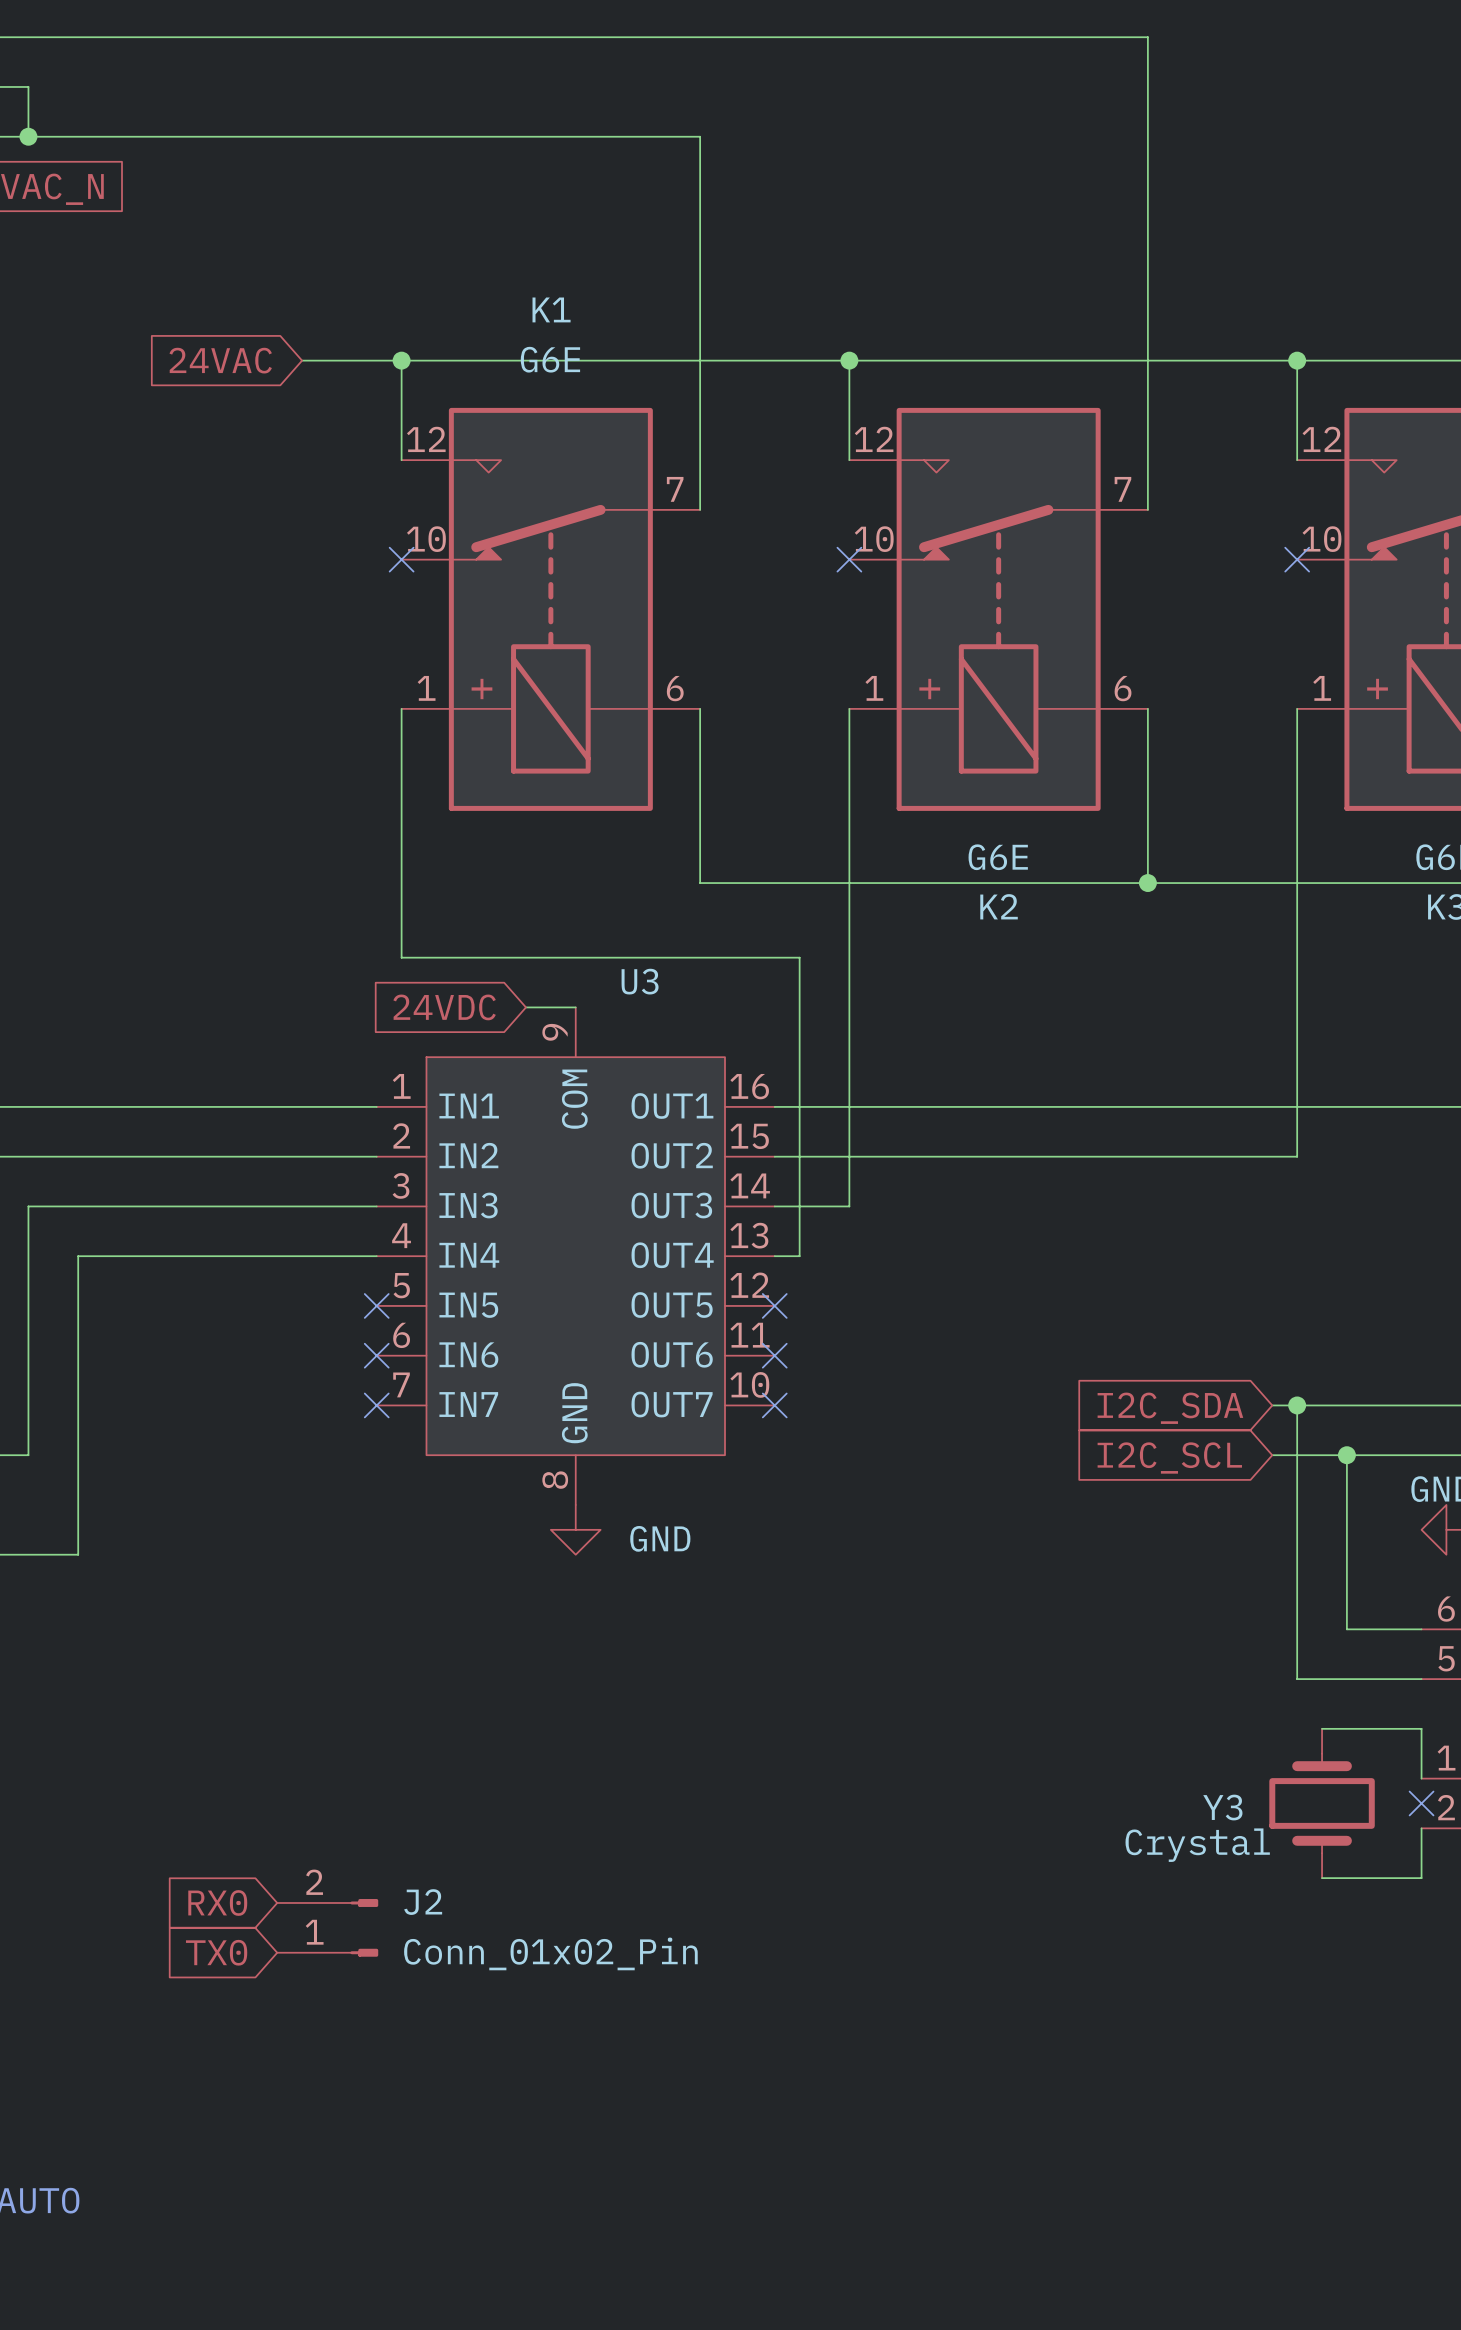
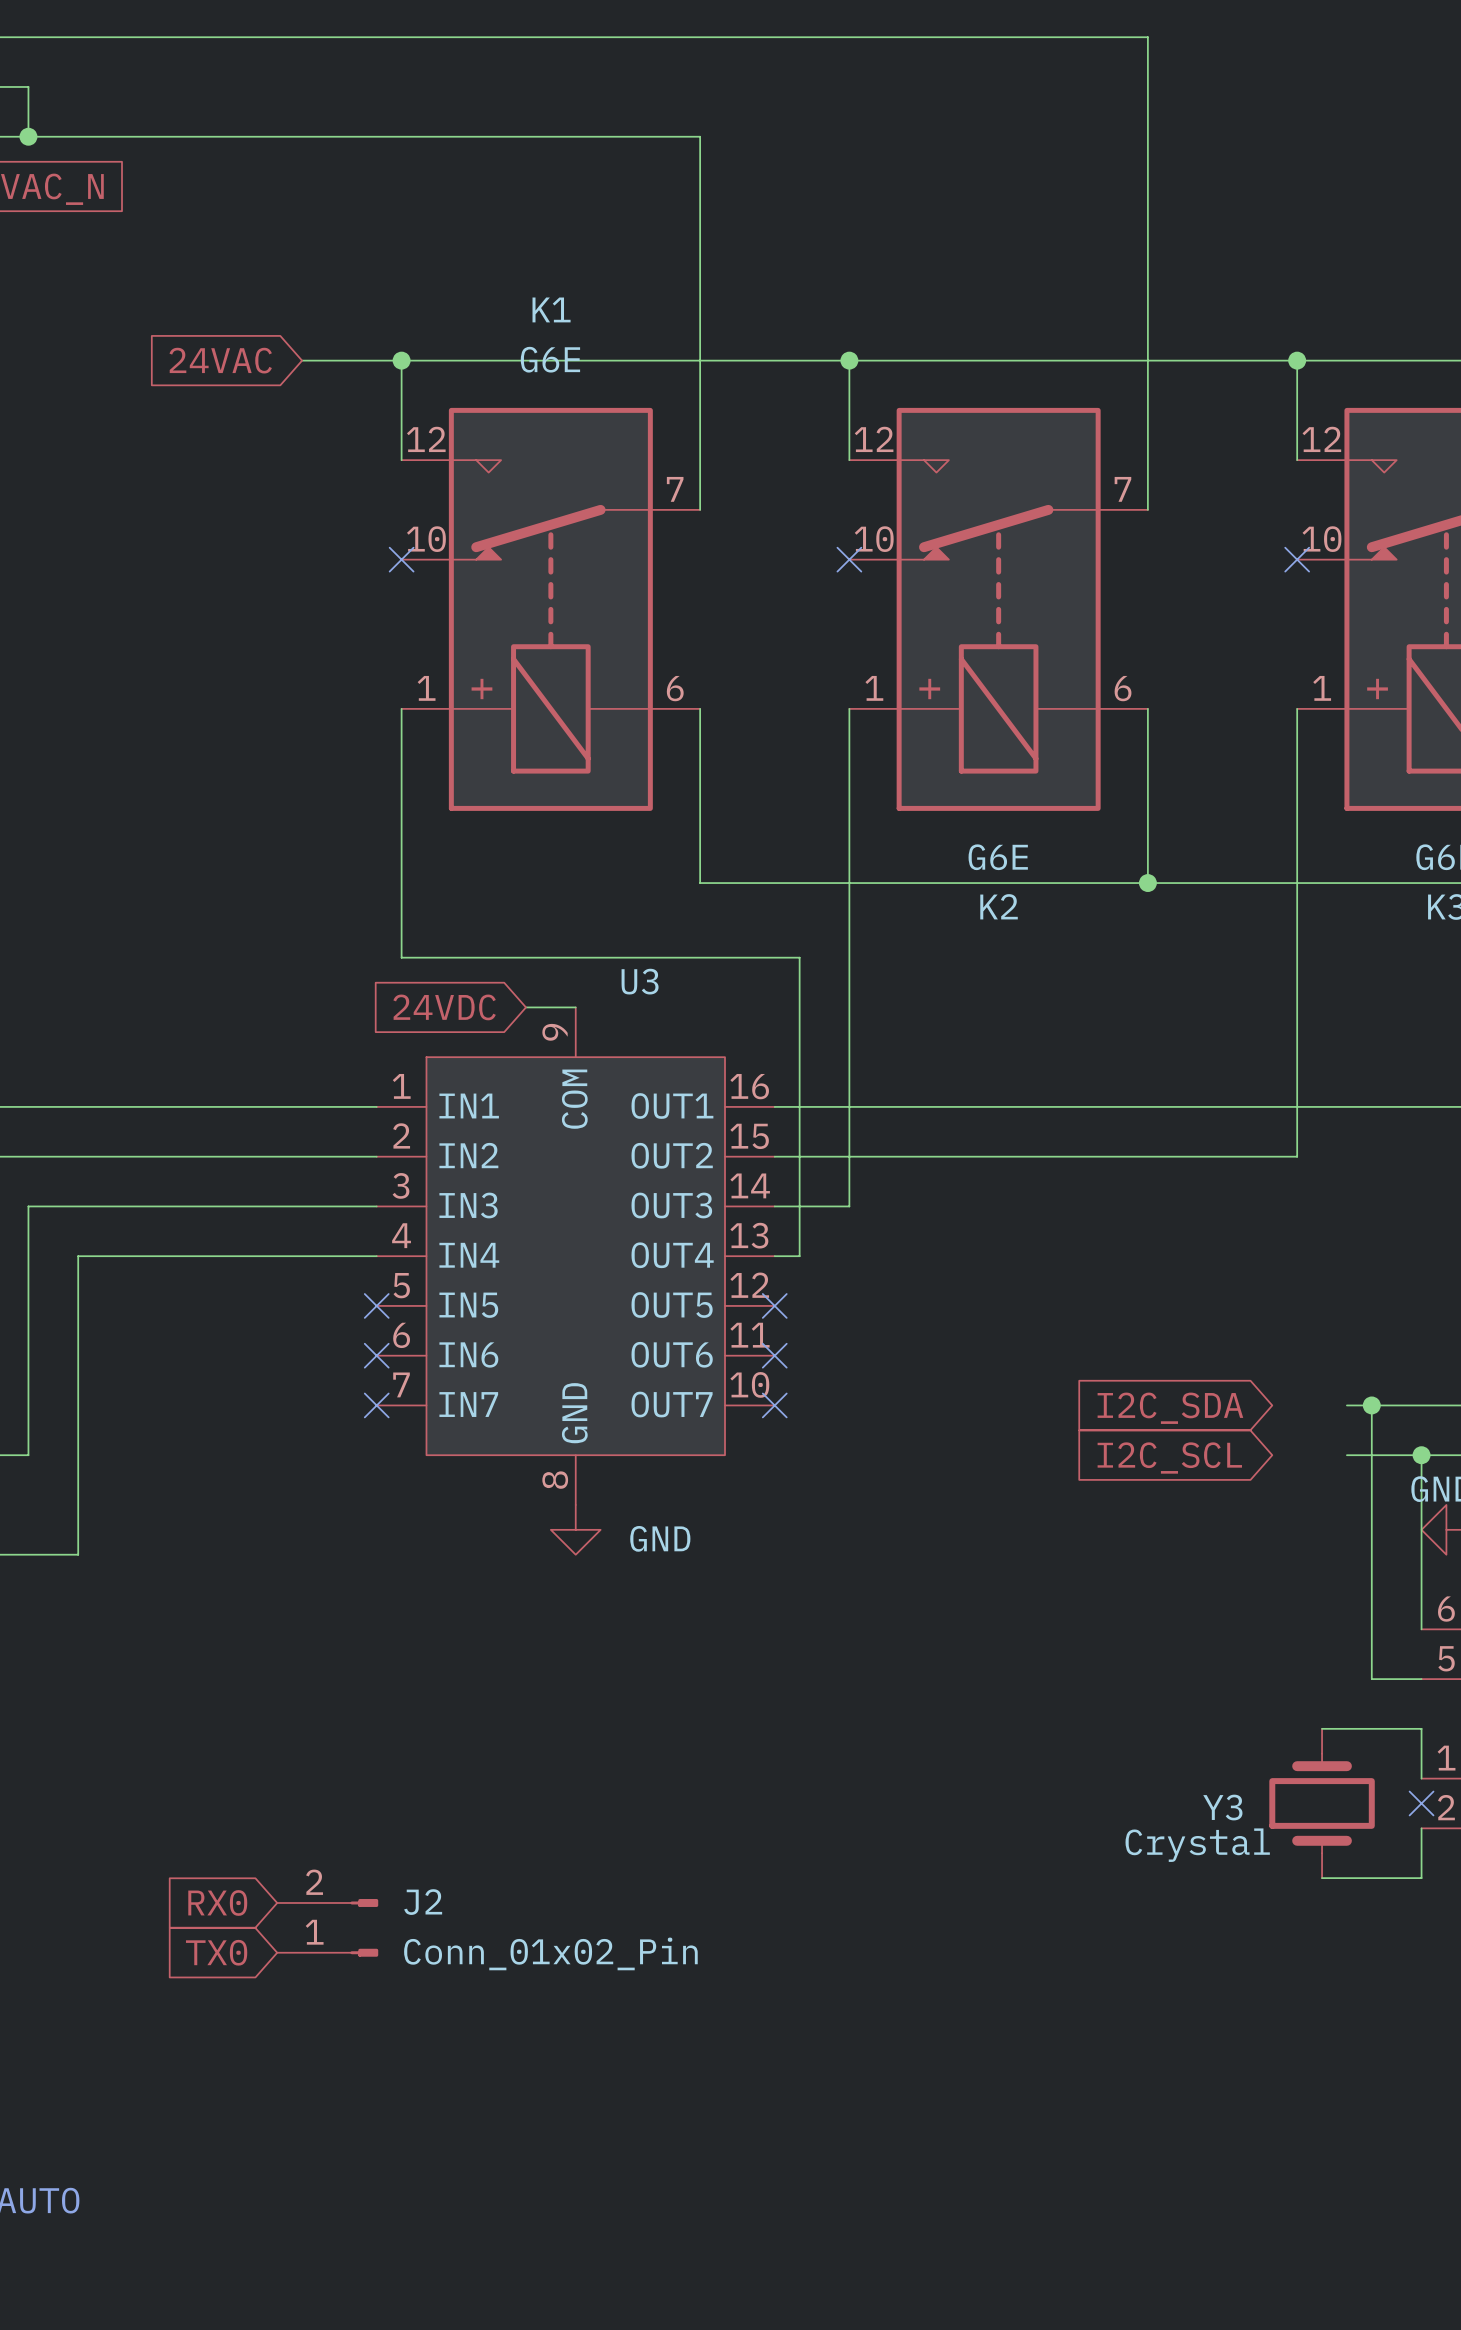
wire: (1272, 1405) (1346, 1405) -> none
wire: (1297, 1405) (1297, 1679) (1371, 1679) -> (1371, 1405) (1371, 1679)
junction: (1297, 1405) -> none
junction: none -> (1371, 1405)
wire: (1272, 1455) (1346, 1455) (1346, 1629) (1421, 1629) -> (1421, 1455) (1421, 1629)
junction: (1346, 1455) -> none
junction: none -> (1421, 1455)

